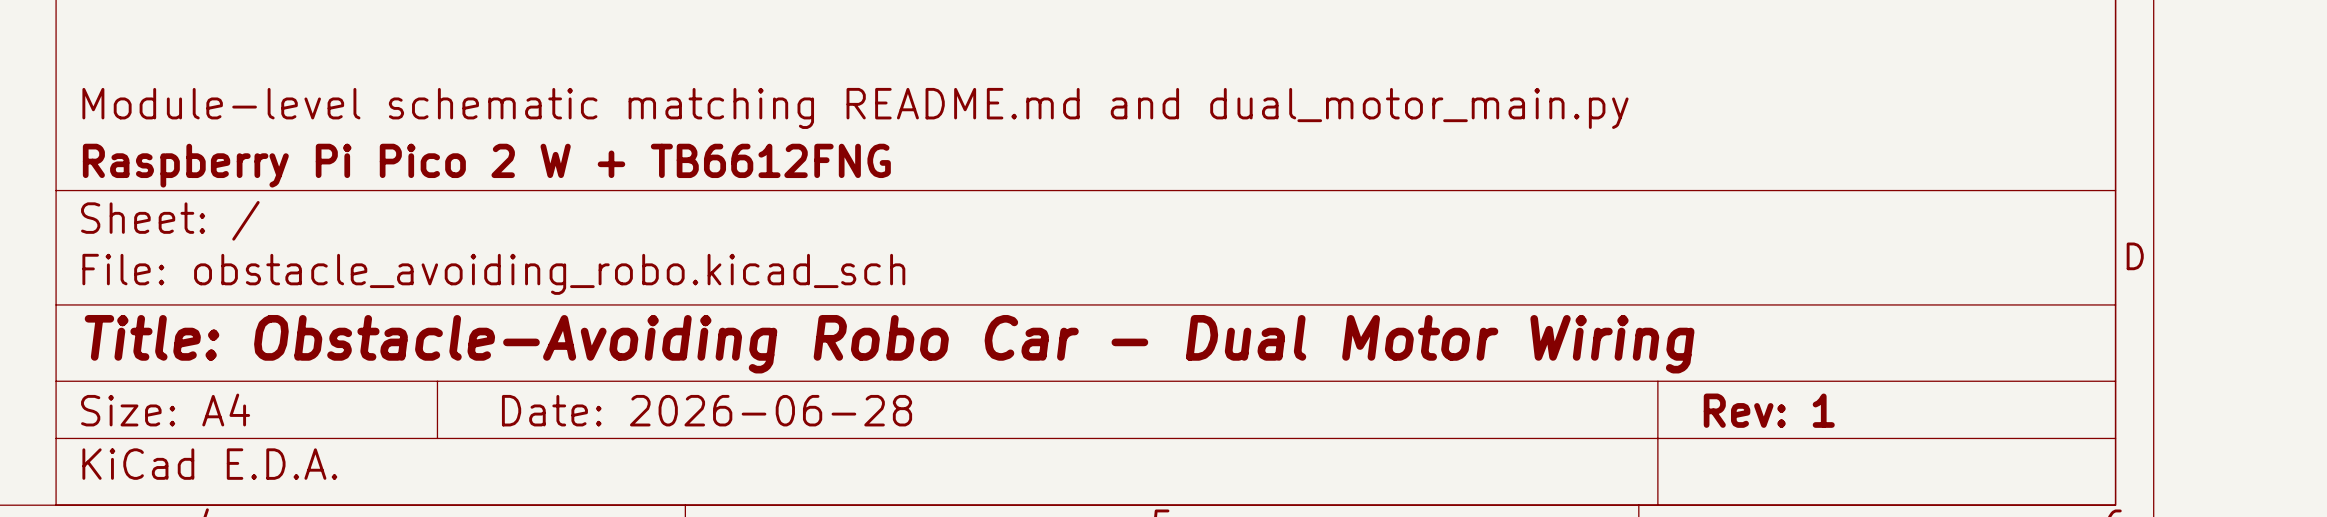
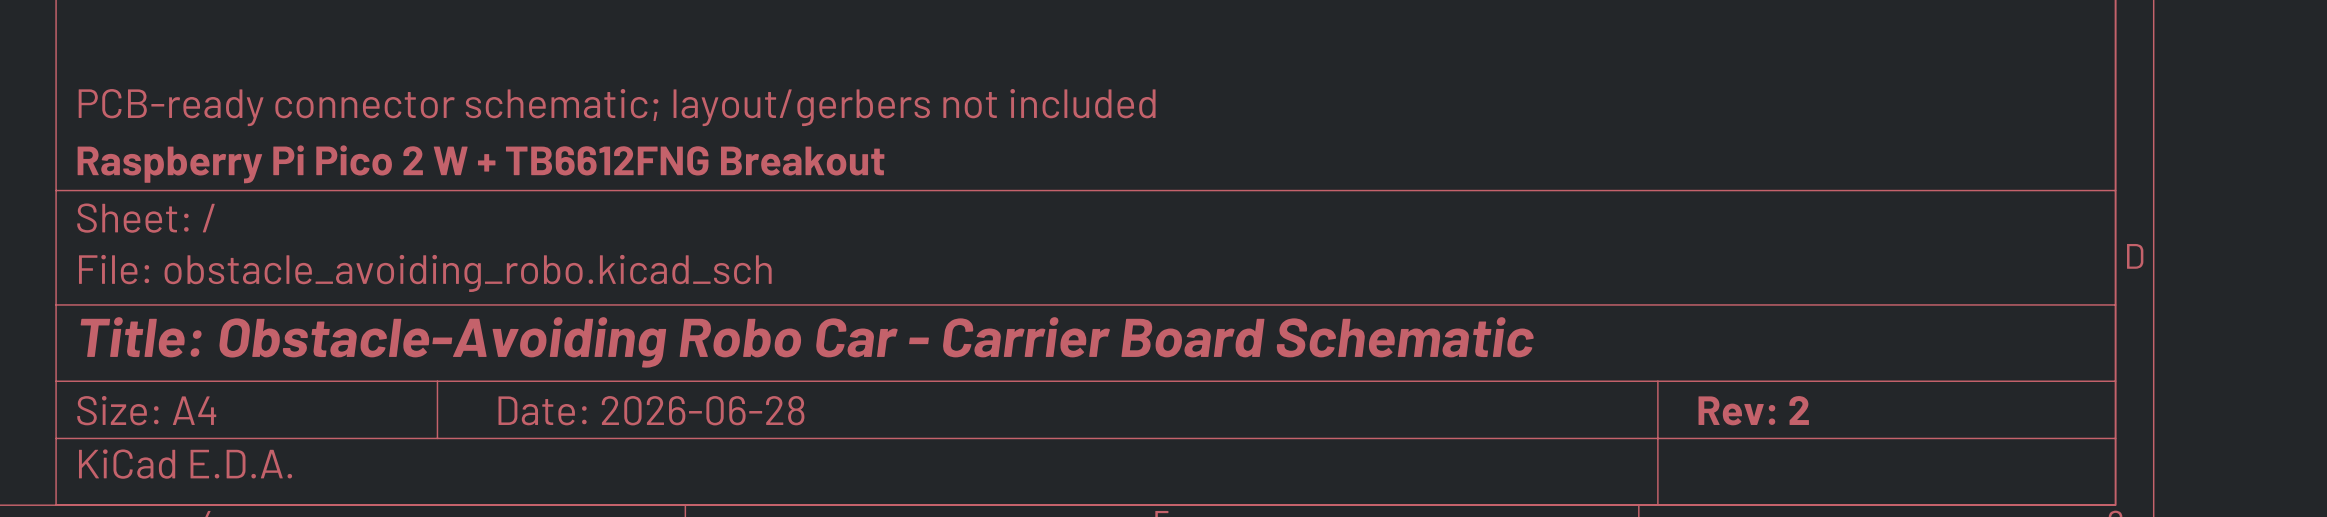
title block: Module-level schematic matching README.md and dual_motor_main.py (855, 108) -> PCB-ready connector schematic; layout/gerbers not included (617, 107)
title block: Raspberry Pi Pico 2 W + TB6612FNG (486, 165) -> Raspberry Pi Pico 2 W + TB6612FNG Breakout (481, 164)
title block: Title: Obstacle-Avoiding Robo Car - Dual Motor Wiring (889, 344) -> Title: Obstacle-Avoiding Robo Car - Carrier Board Schematic (807, 342)
title block: Rev: 1 (1769, 410) -> Rev: 2 (1753, 410)

